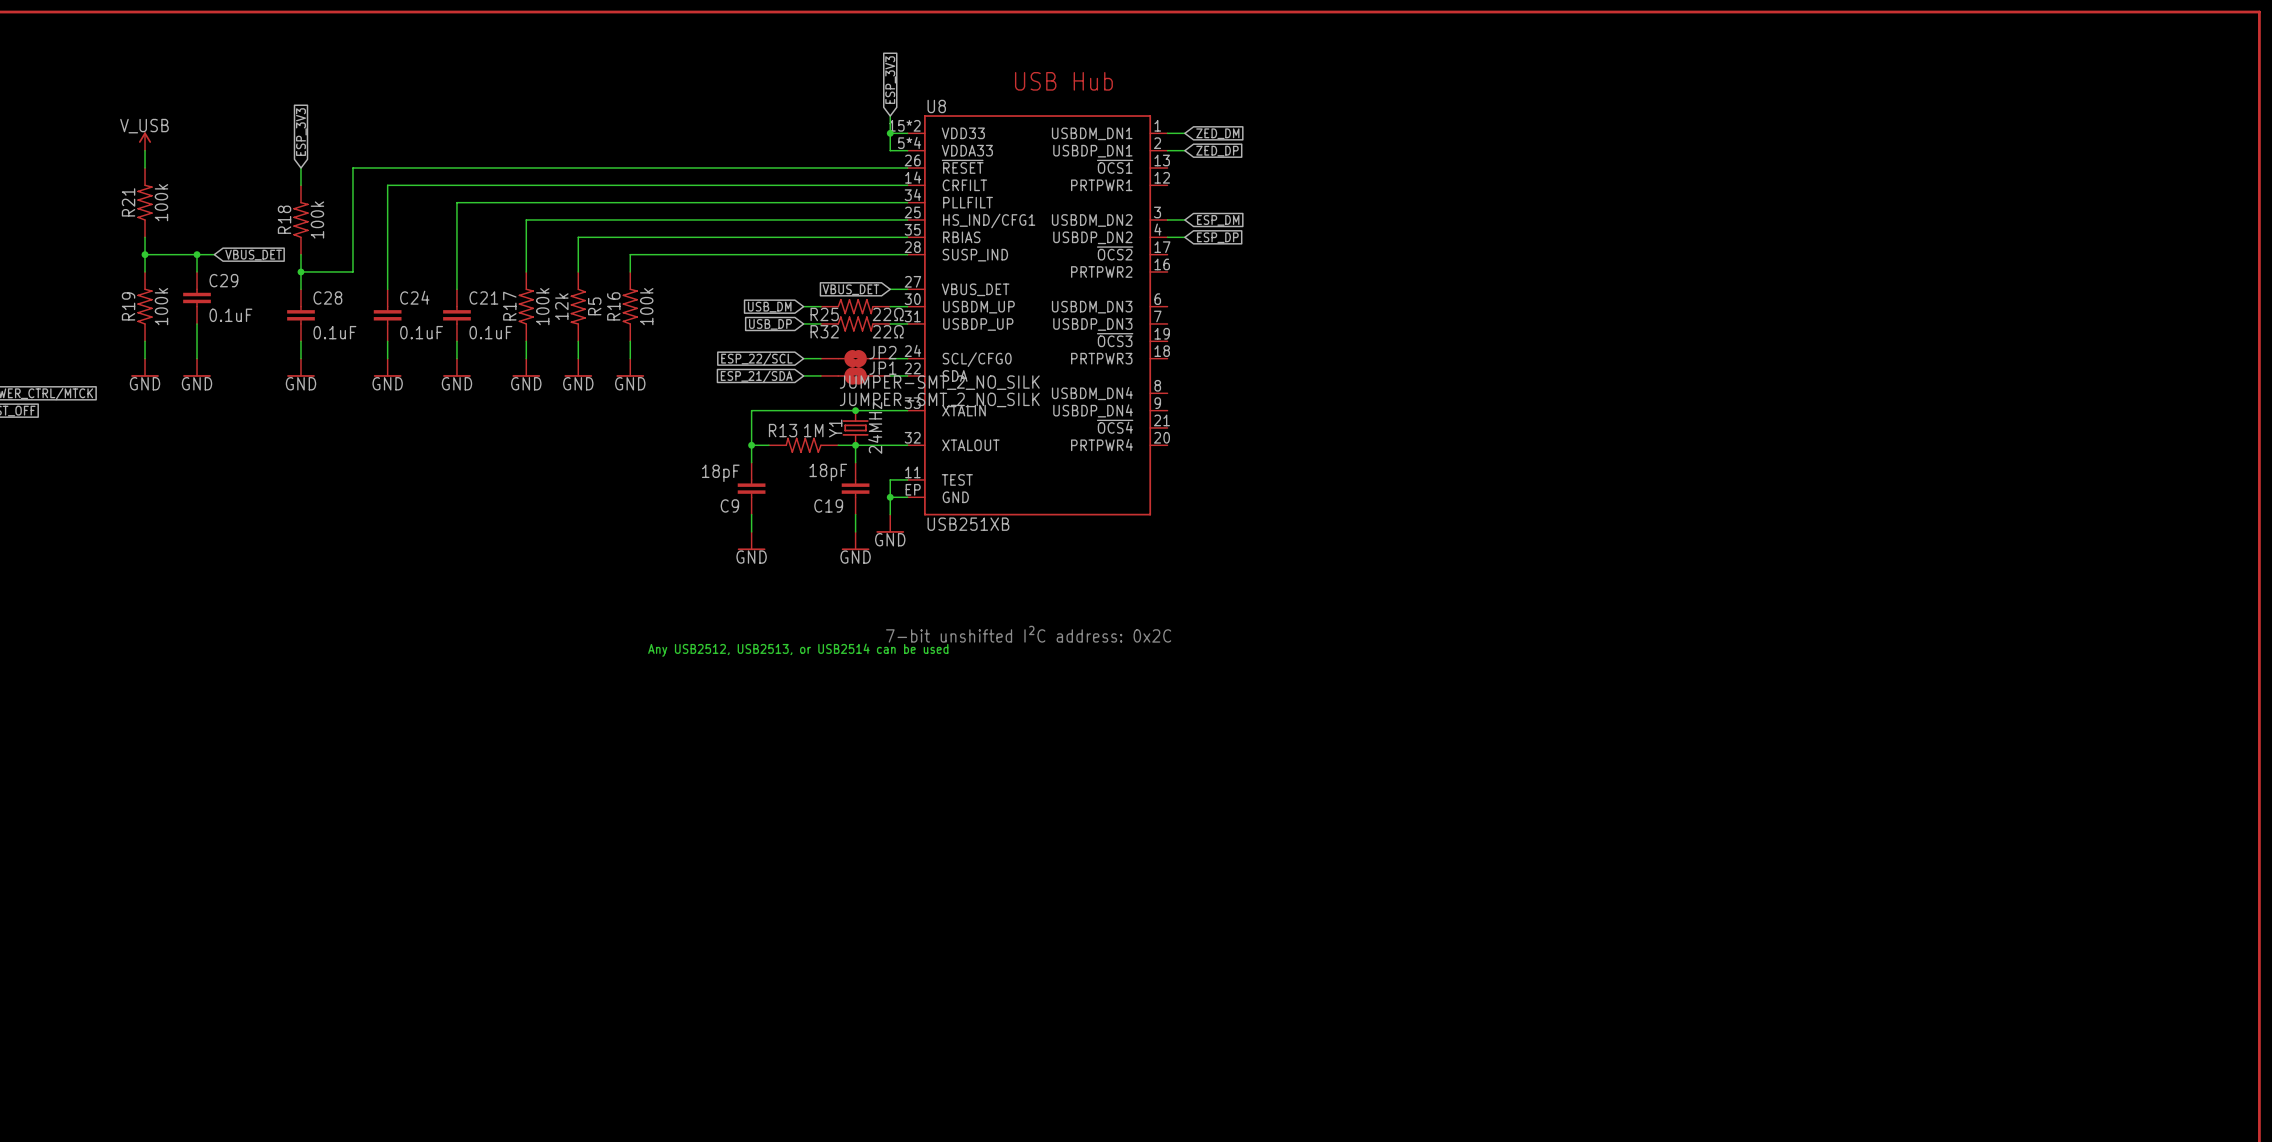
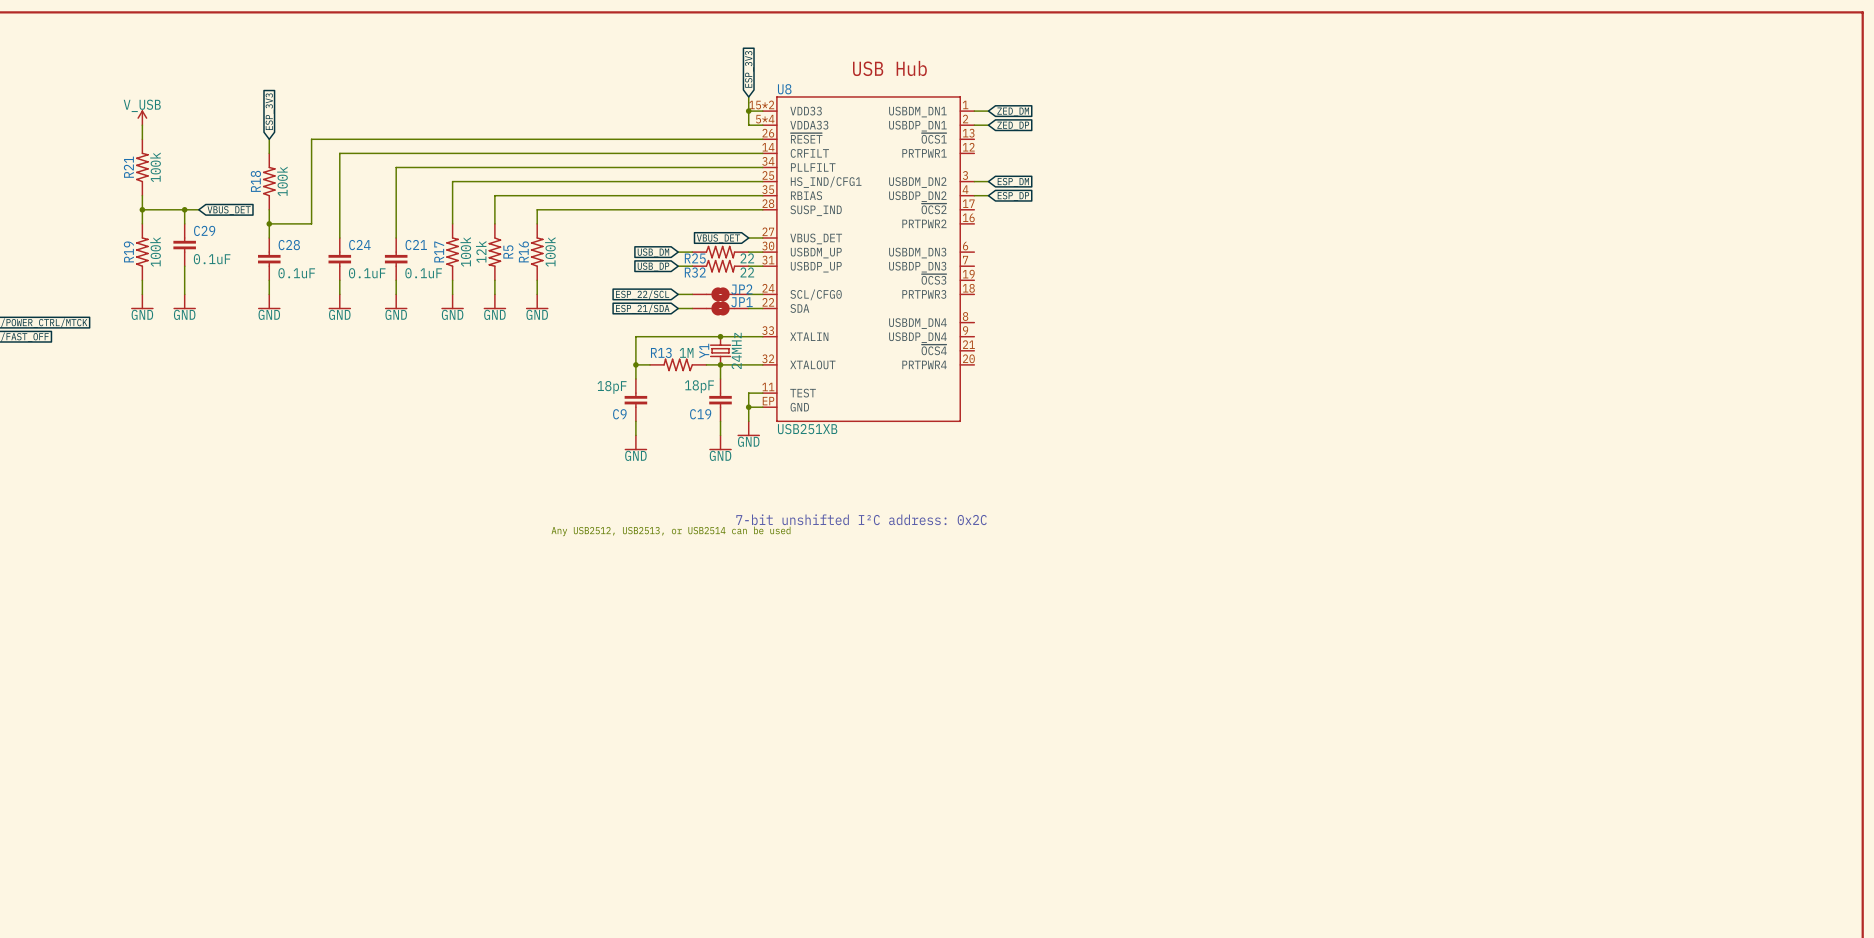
R25 value: 22Ω (888, 314) -> 22 (747, 258)
R32 value: 22Ω (888, 331) -> 22 (747, 272)
JP2 value: JUMPER-SMT_2_NO_SILK (939, 382) -> none
JP1 value: JUMPER-SMT_2_NO_SILK (939, 399) -> none

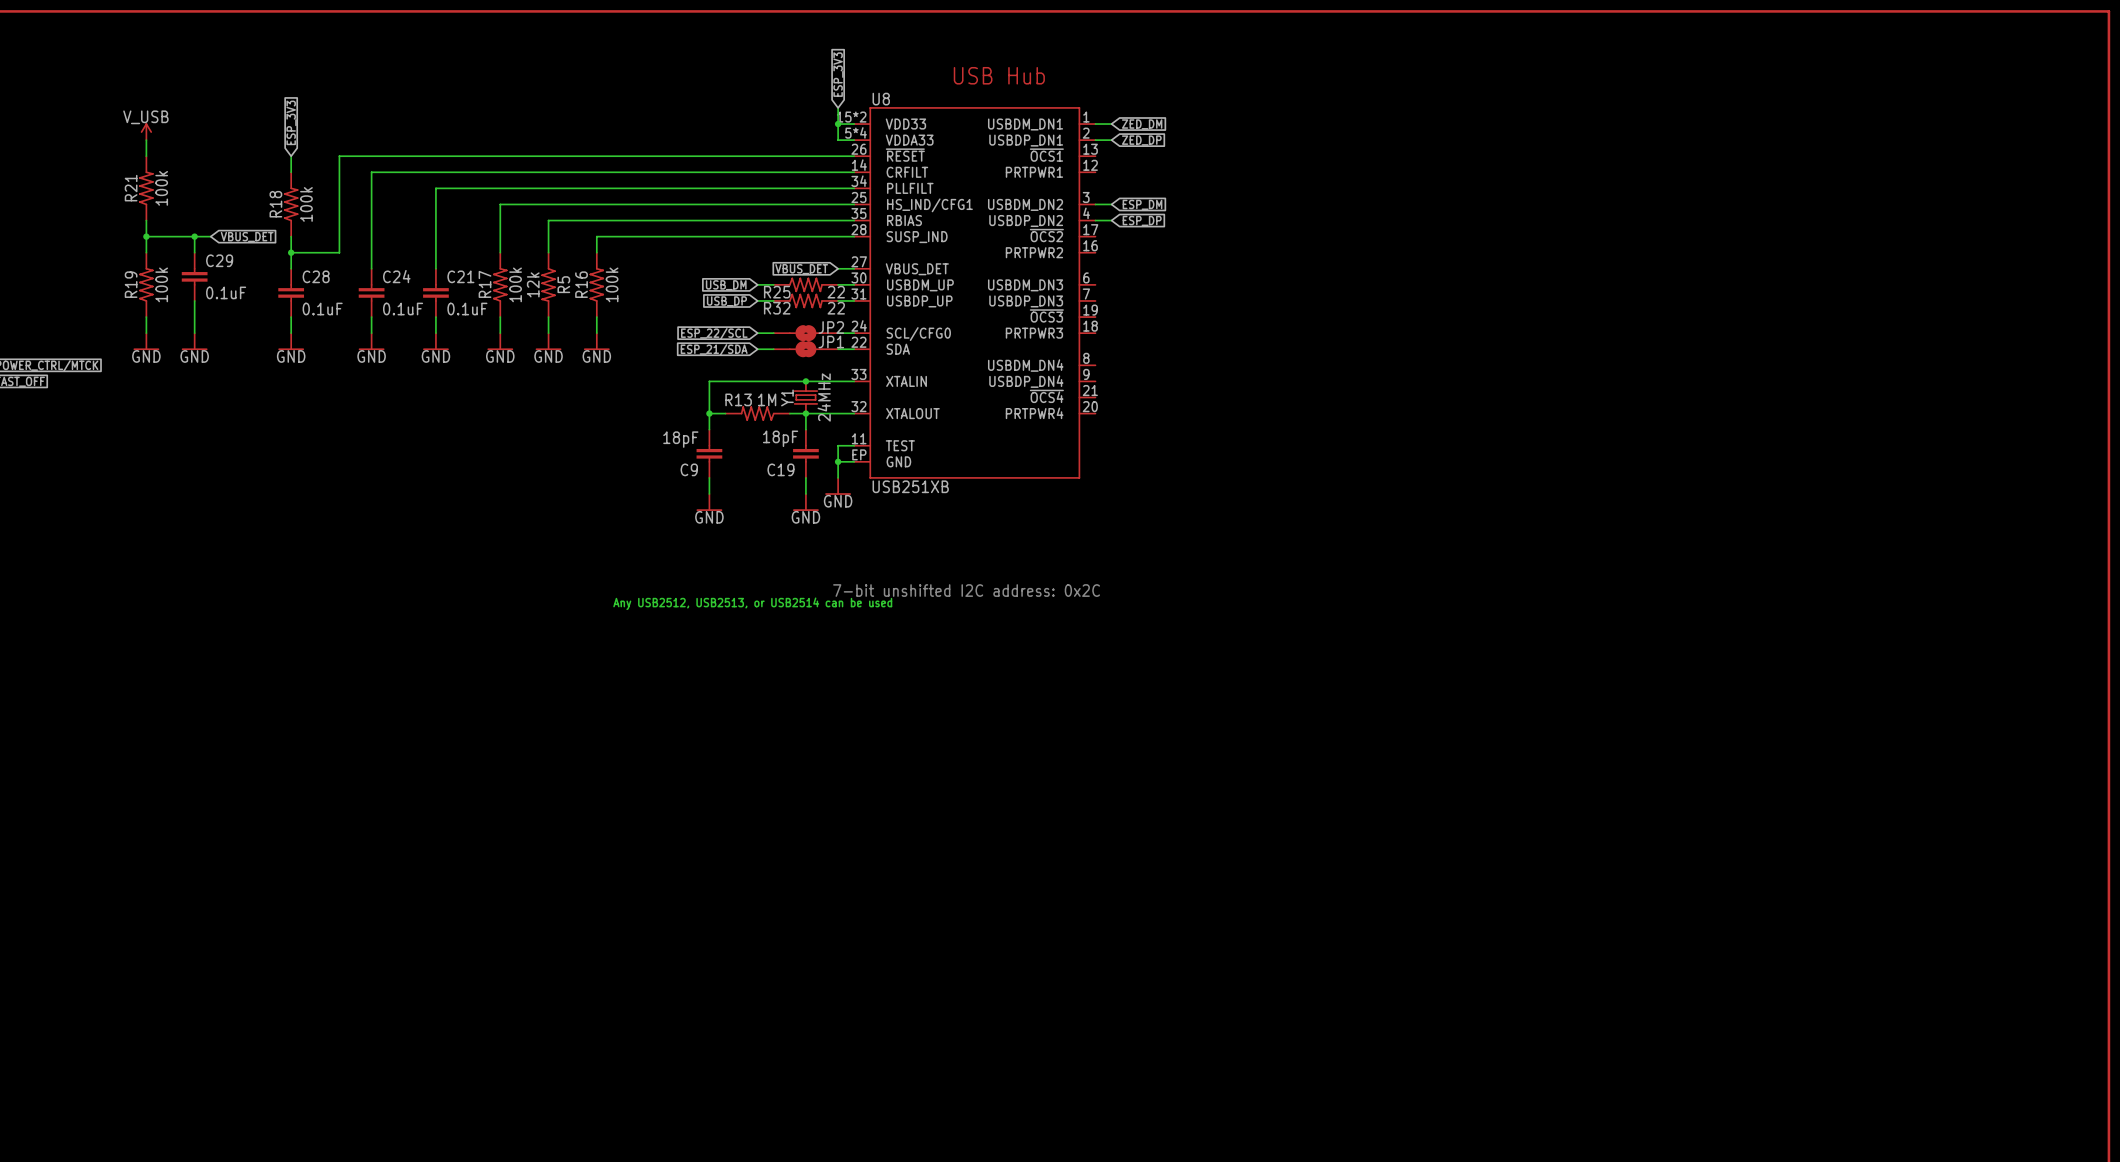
text: 7-bit unshifted I²C address: 0x2C (861, 519) -> 7-bit unshifted I2C address: 0x2C (966, 590)

